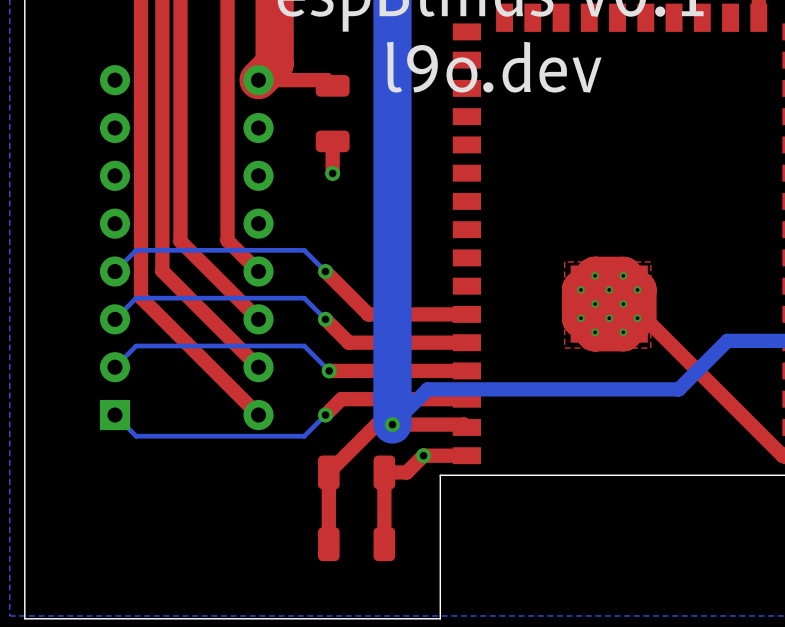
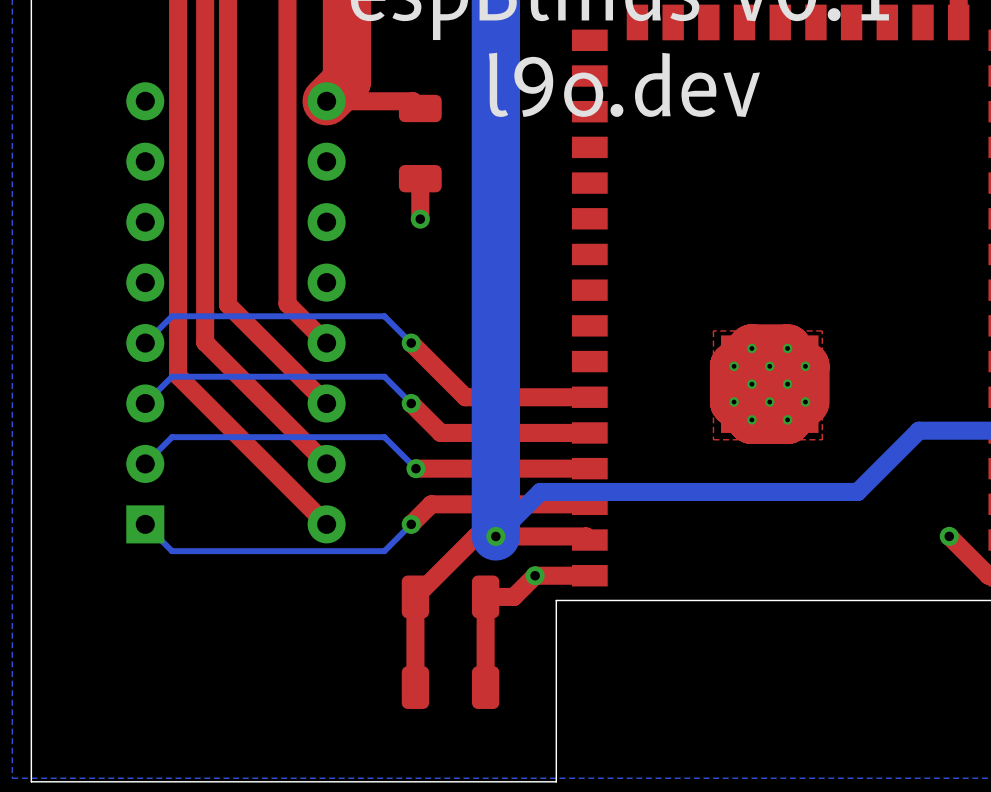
top track: (644, 318) (751, 424) -> none
via: none -> (949, 536)

